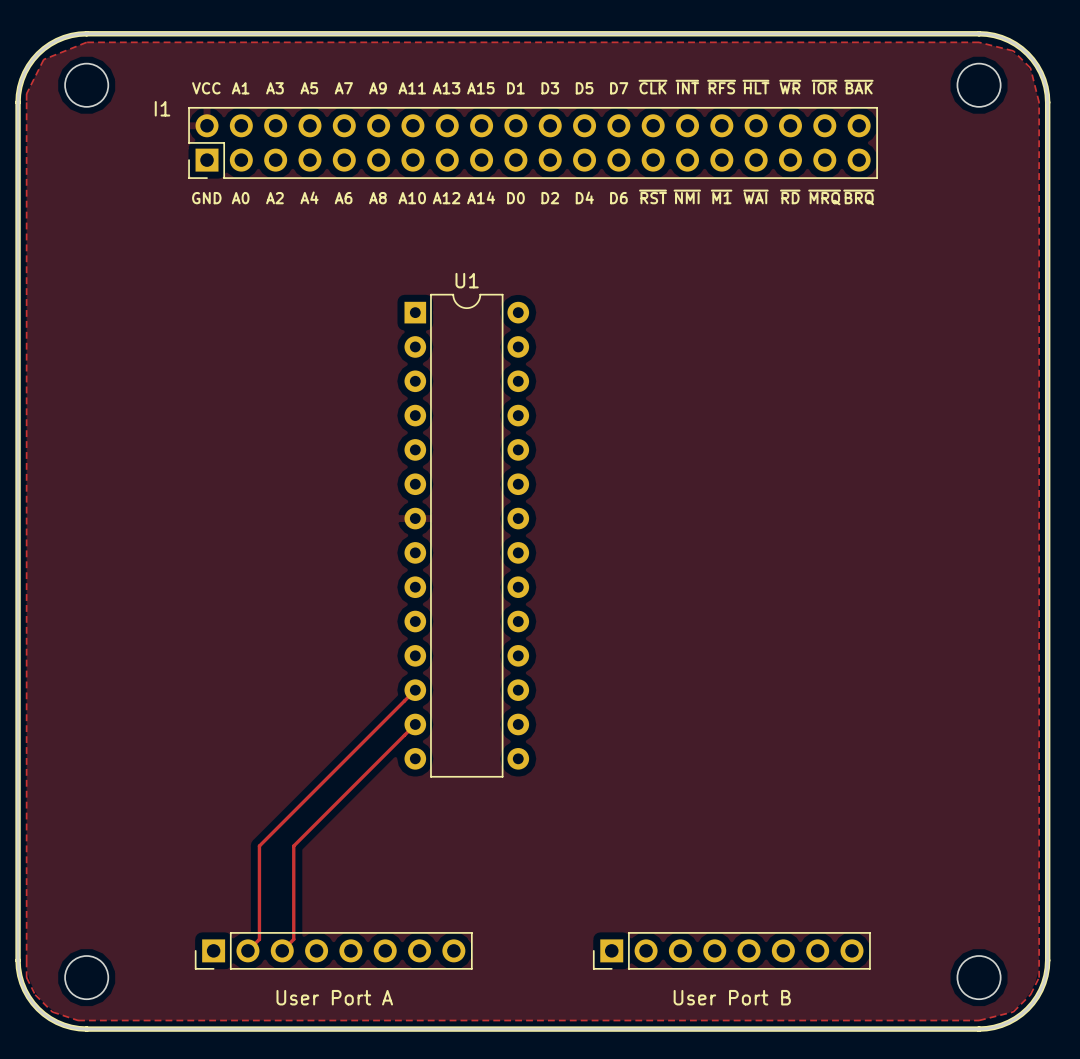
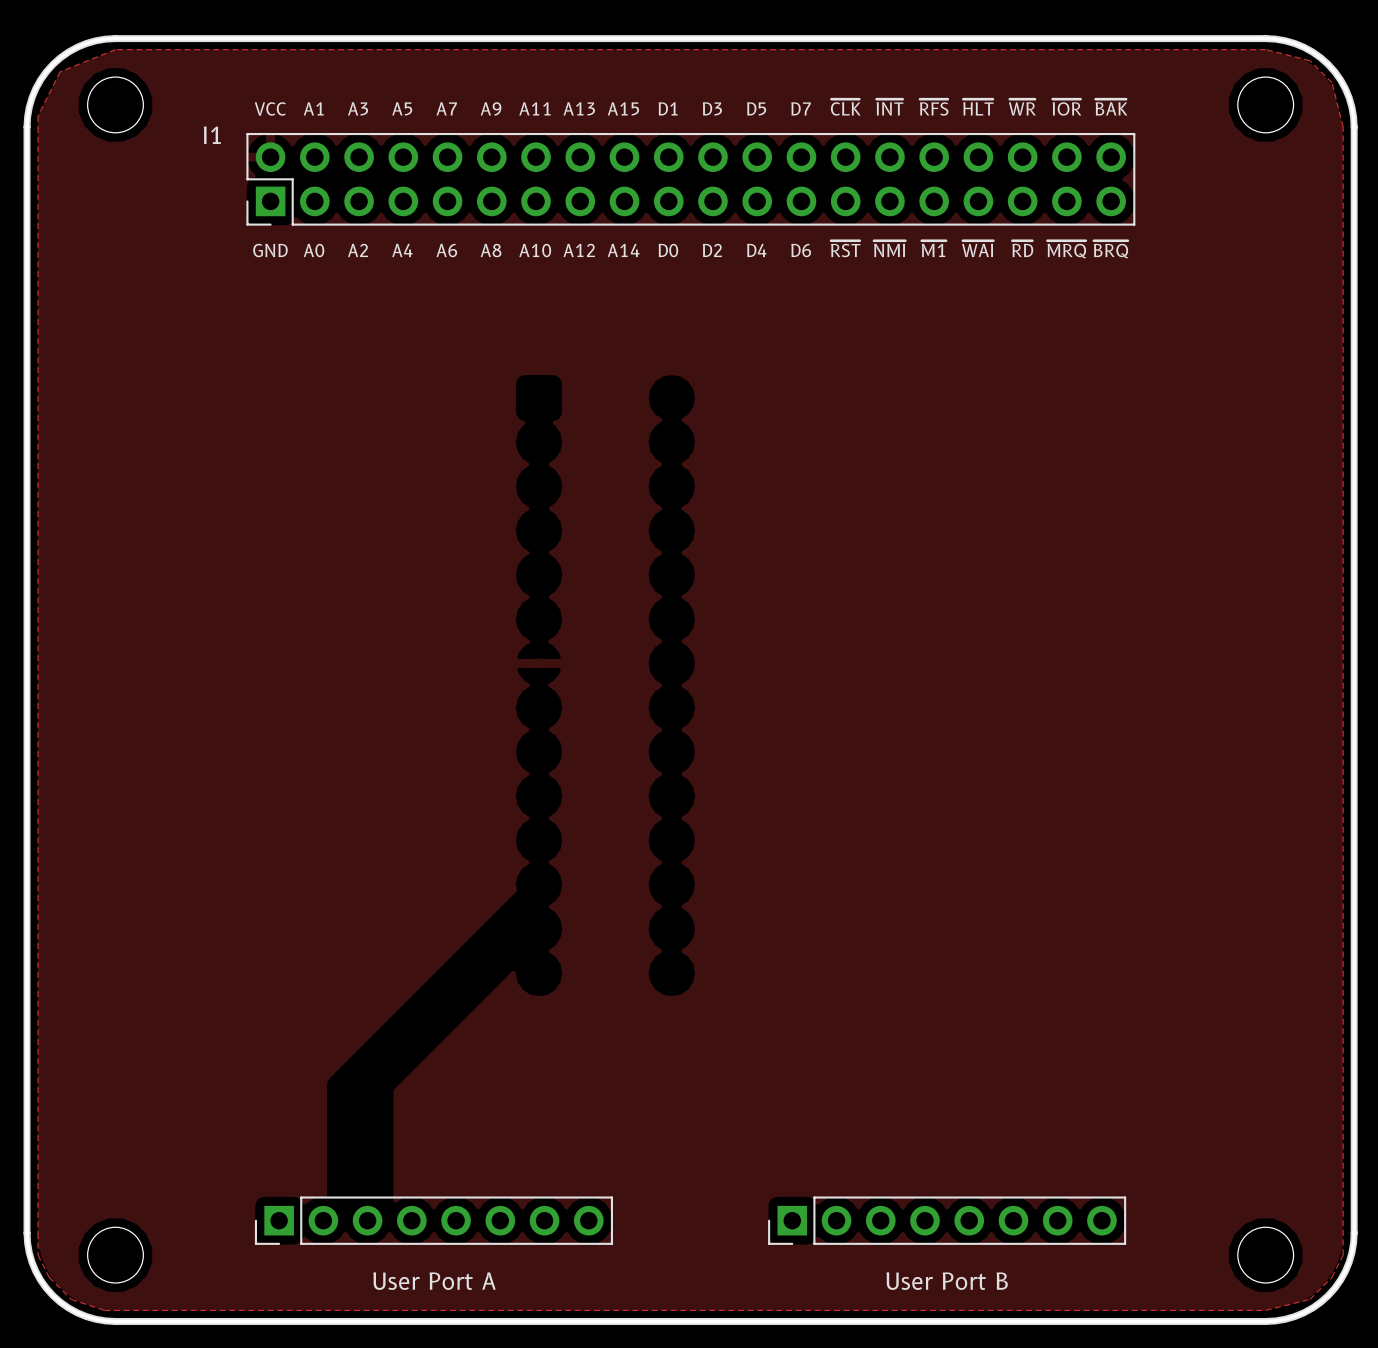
U1: (466, 535) -> none
track: (415, 690) (259, 846) (259, 939) (247, 950) -> none
track: (415, 724) (293, 846) (293, 939) (282, 950) -> none

